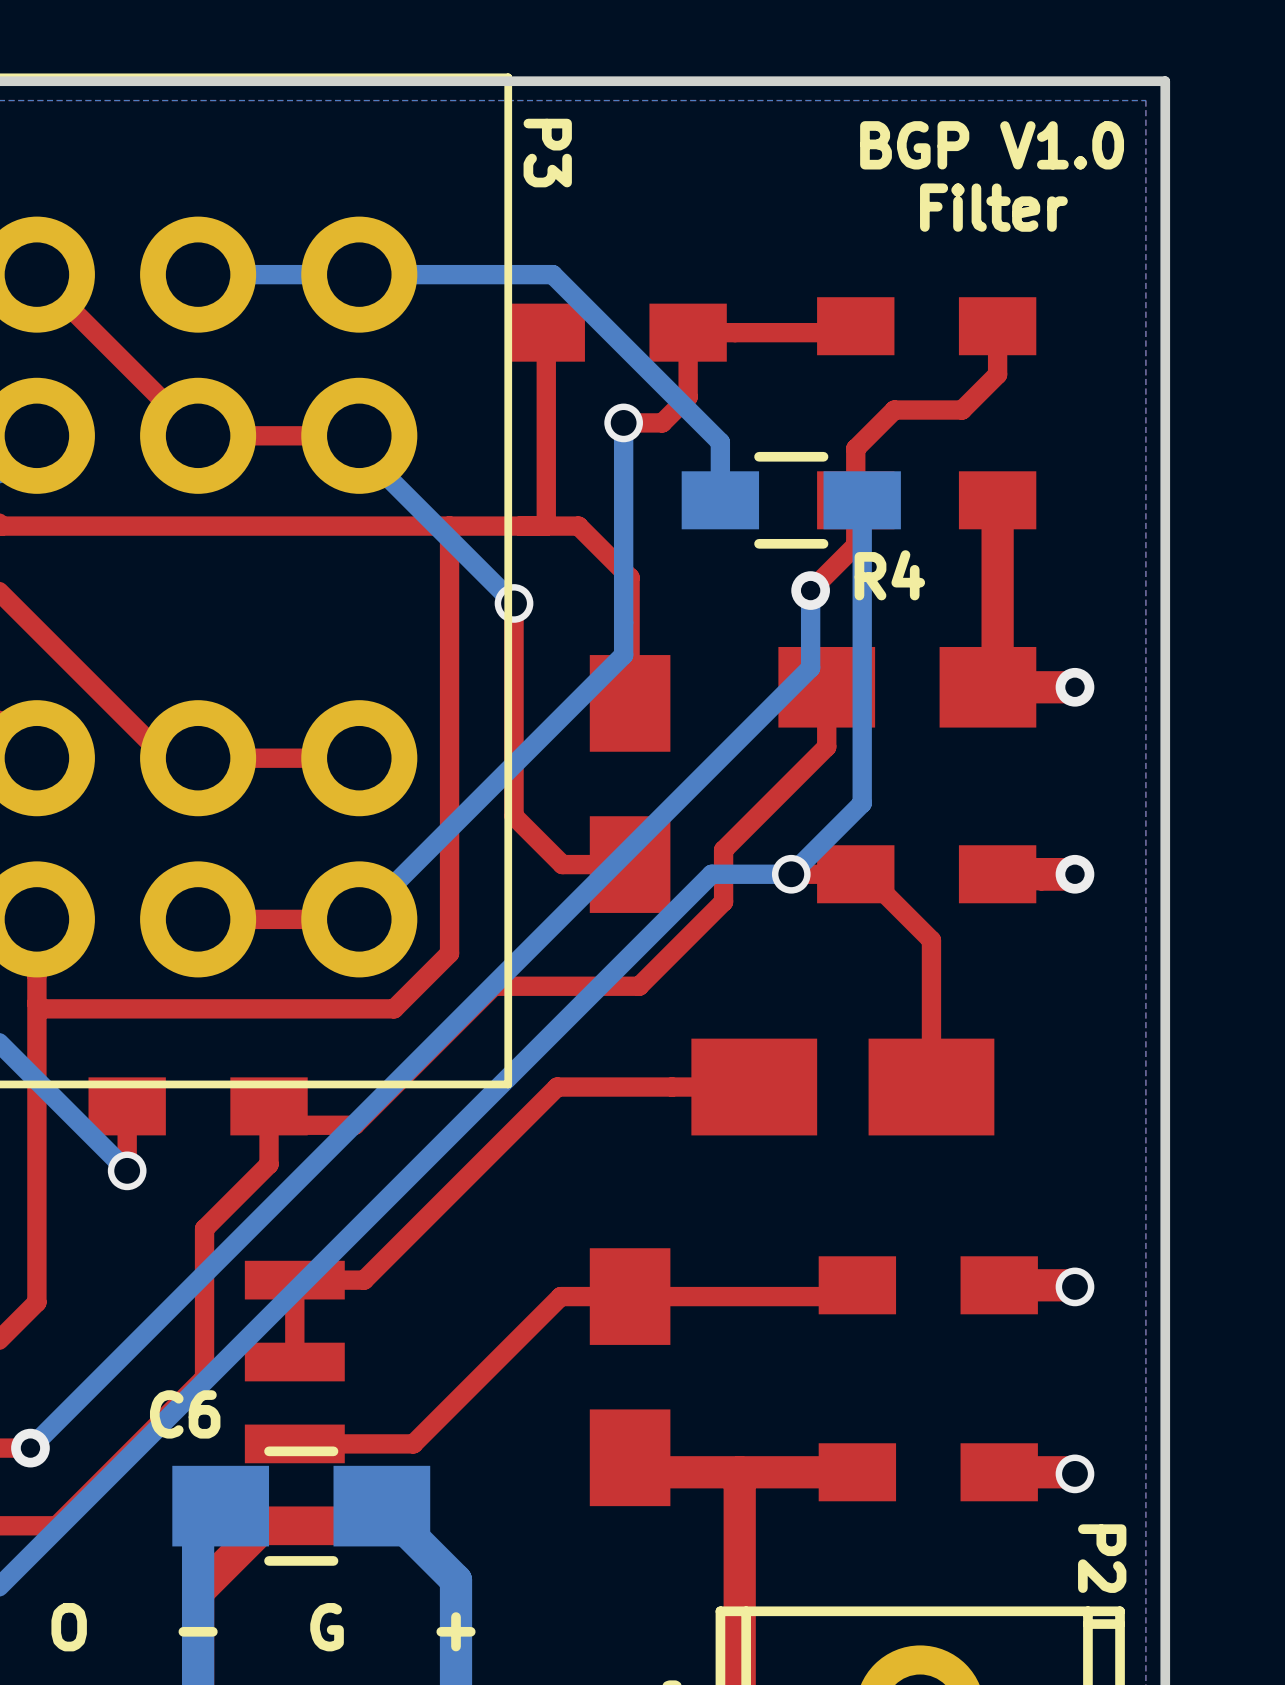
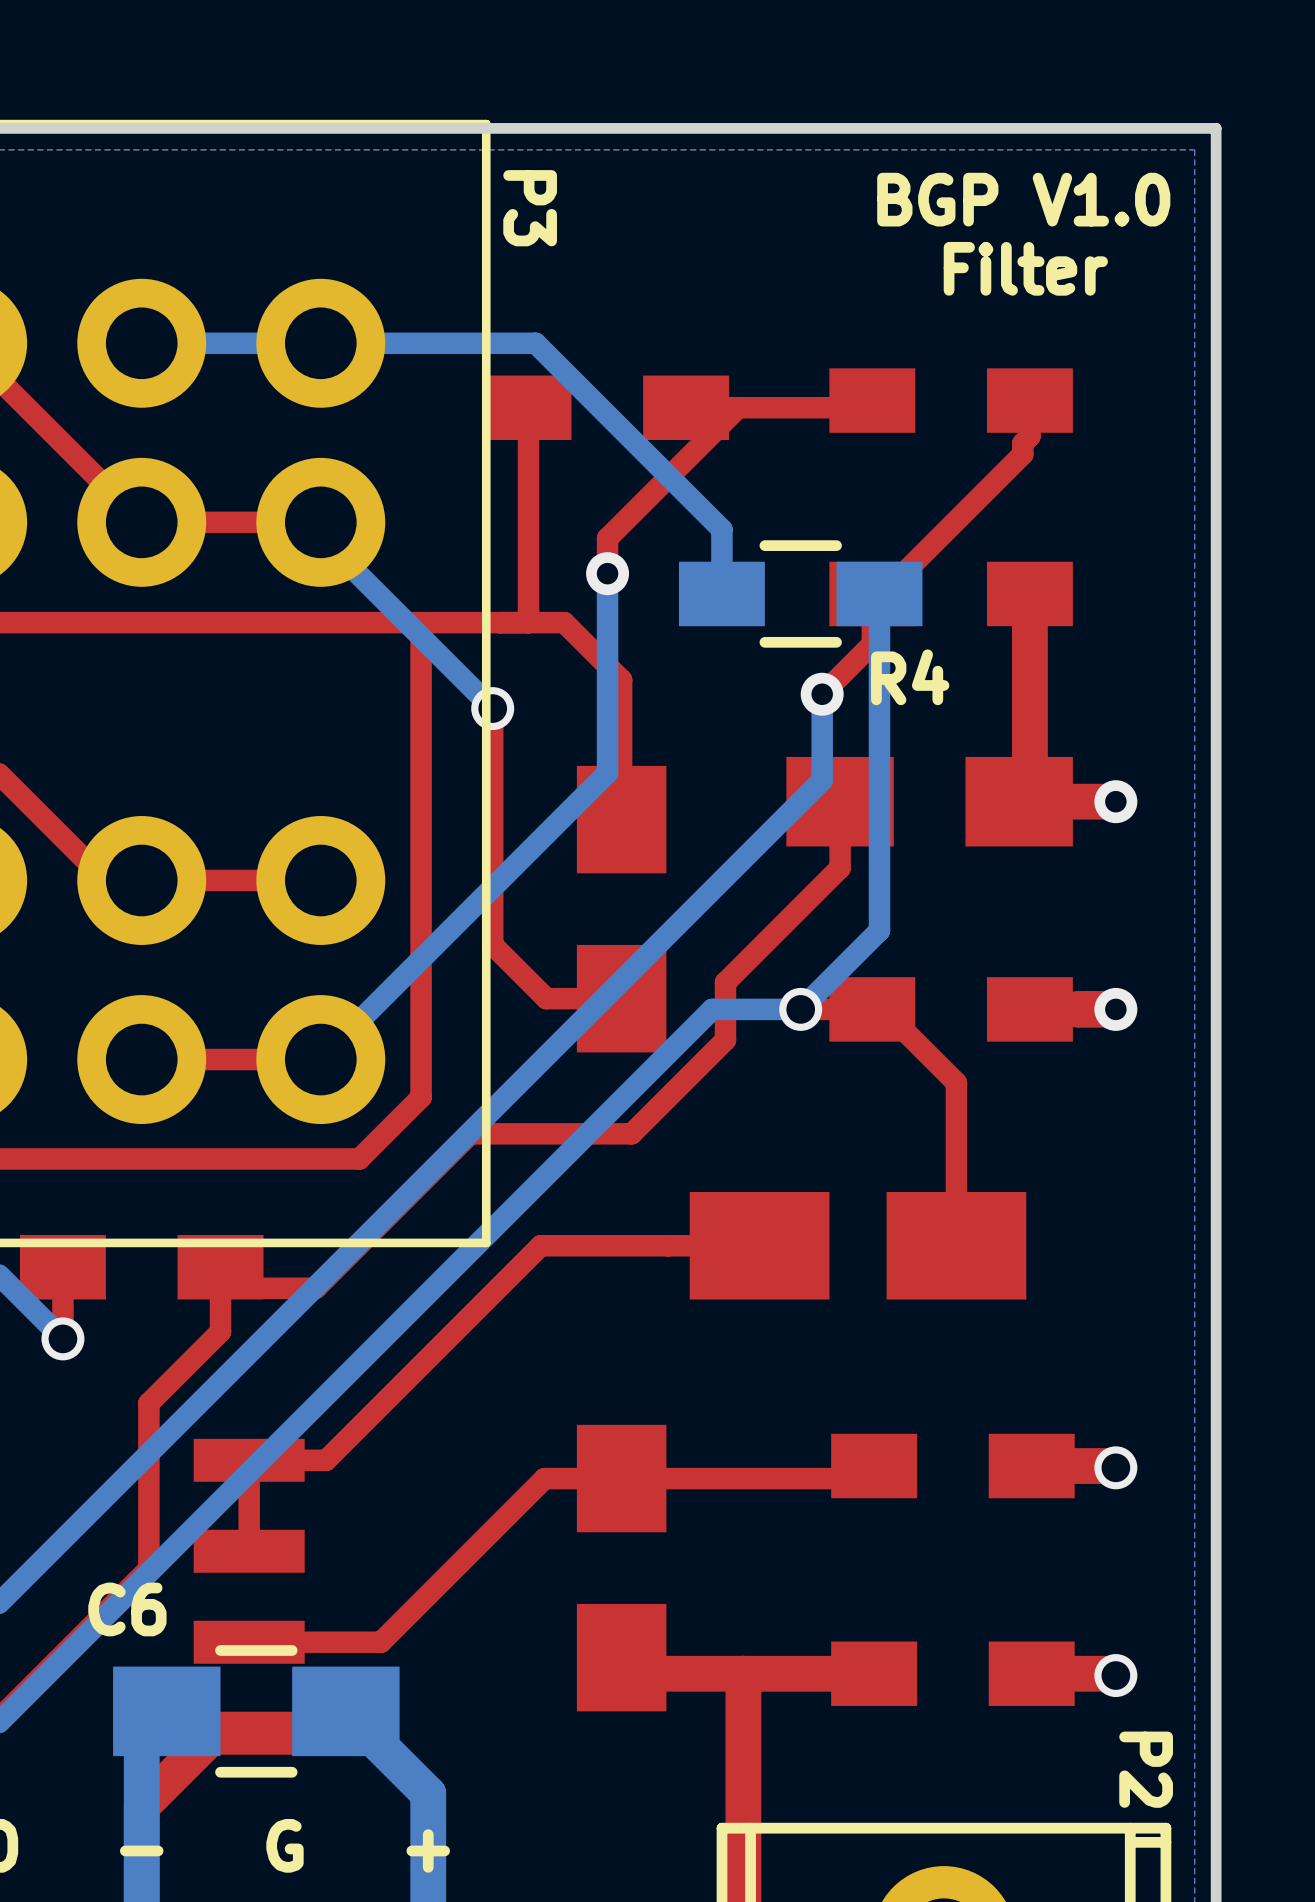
top track: (688, 332) (688, 397) (662, 422) (623, 422) -> none
top track: none -> (738, 407) (607, 538) (607, 573)
top track: (997, 358) (997, 374) (962, 410) (894, 410) (855, 448) (855, 500) -> (1029, 436) (1022, 443) (1022, 454) (872, 604)
bottom track: (623, 422) (623, 655) (617, 661) -> (607, 573) (607, 772)
via: (623, 422) -> none
via: none -> (607, 573)

